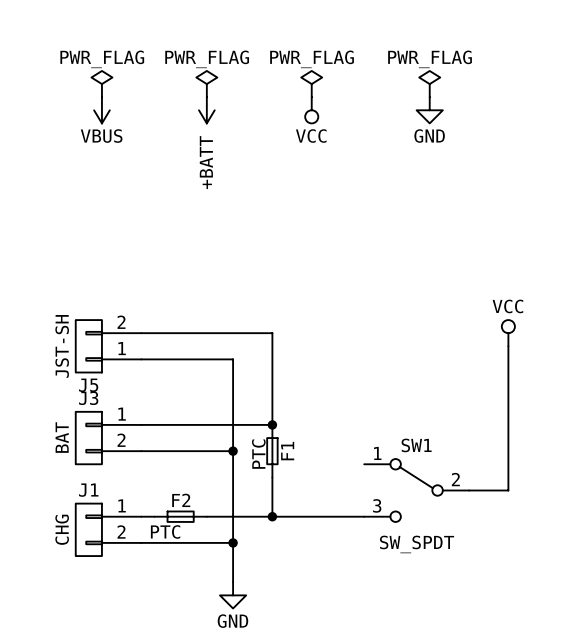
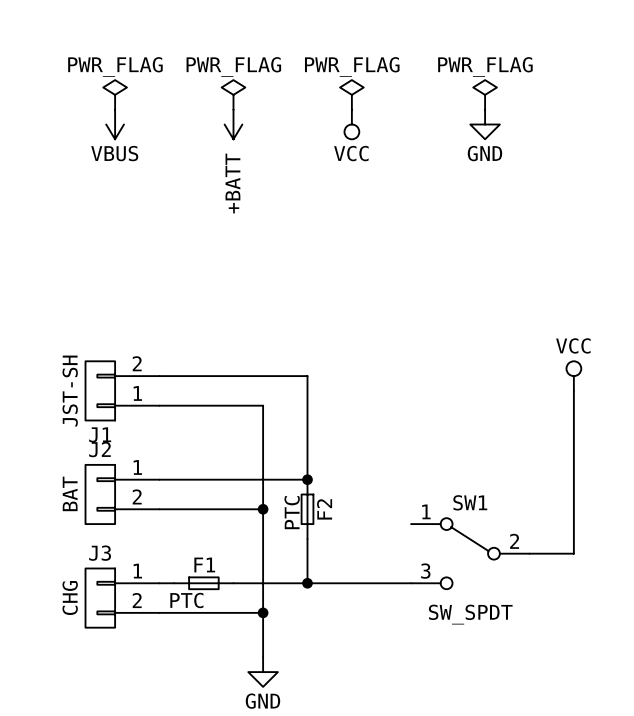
J5 name: J5 (88, 385) -> J1 (100, 434)
J3 name: J3 (88, 398) -> J2 (99, 449)
F1 name: F1 (287, 451) -> F2 (324, 509)
J1 name: J1 (88, 490) -> J3 (100, 553)
F2 name: F2 (181, 500) -> F1 (204, 564)

